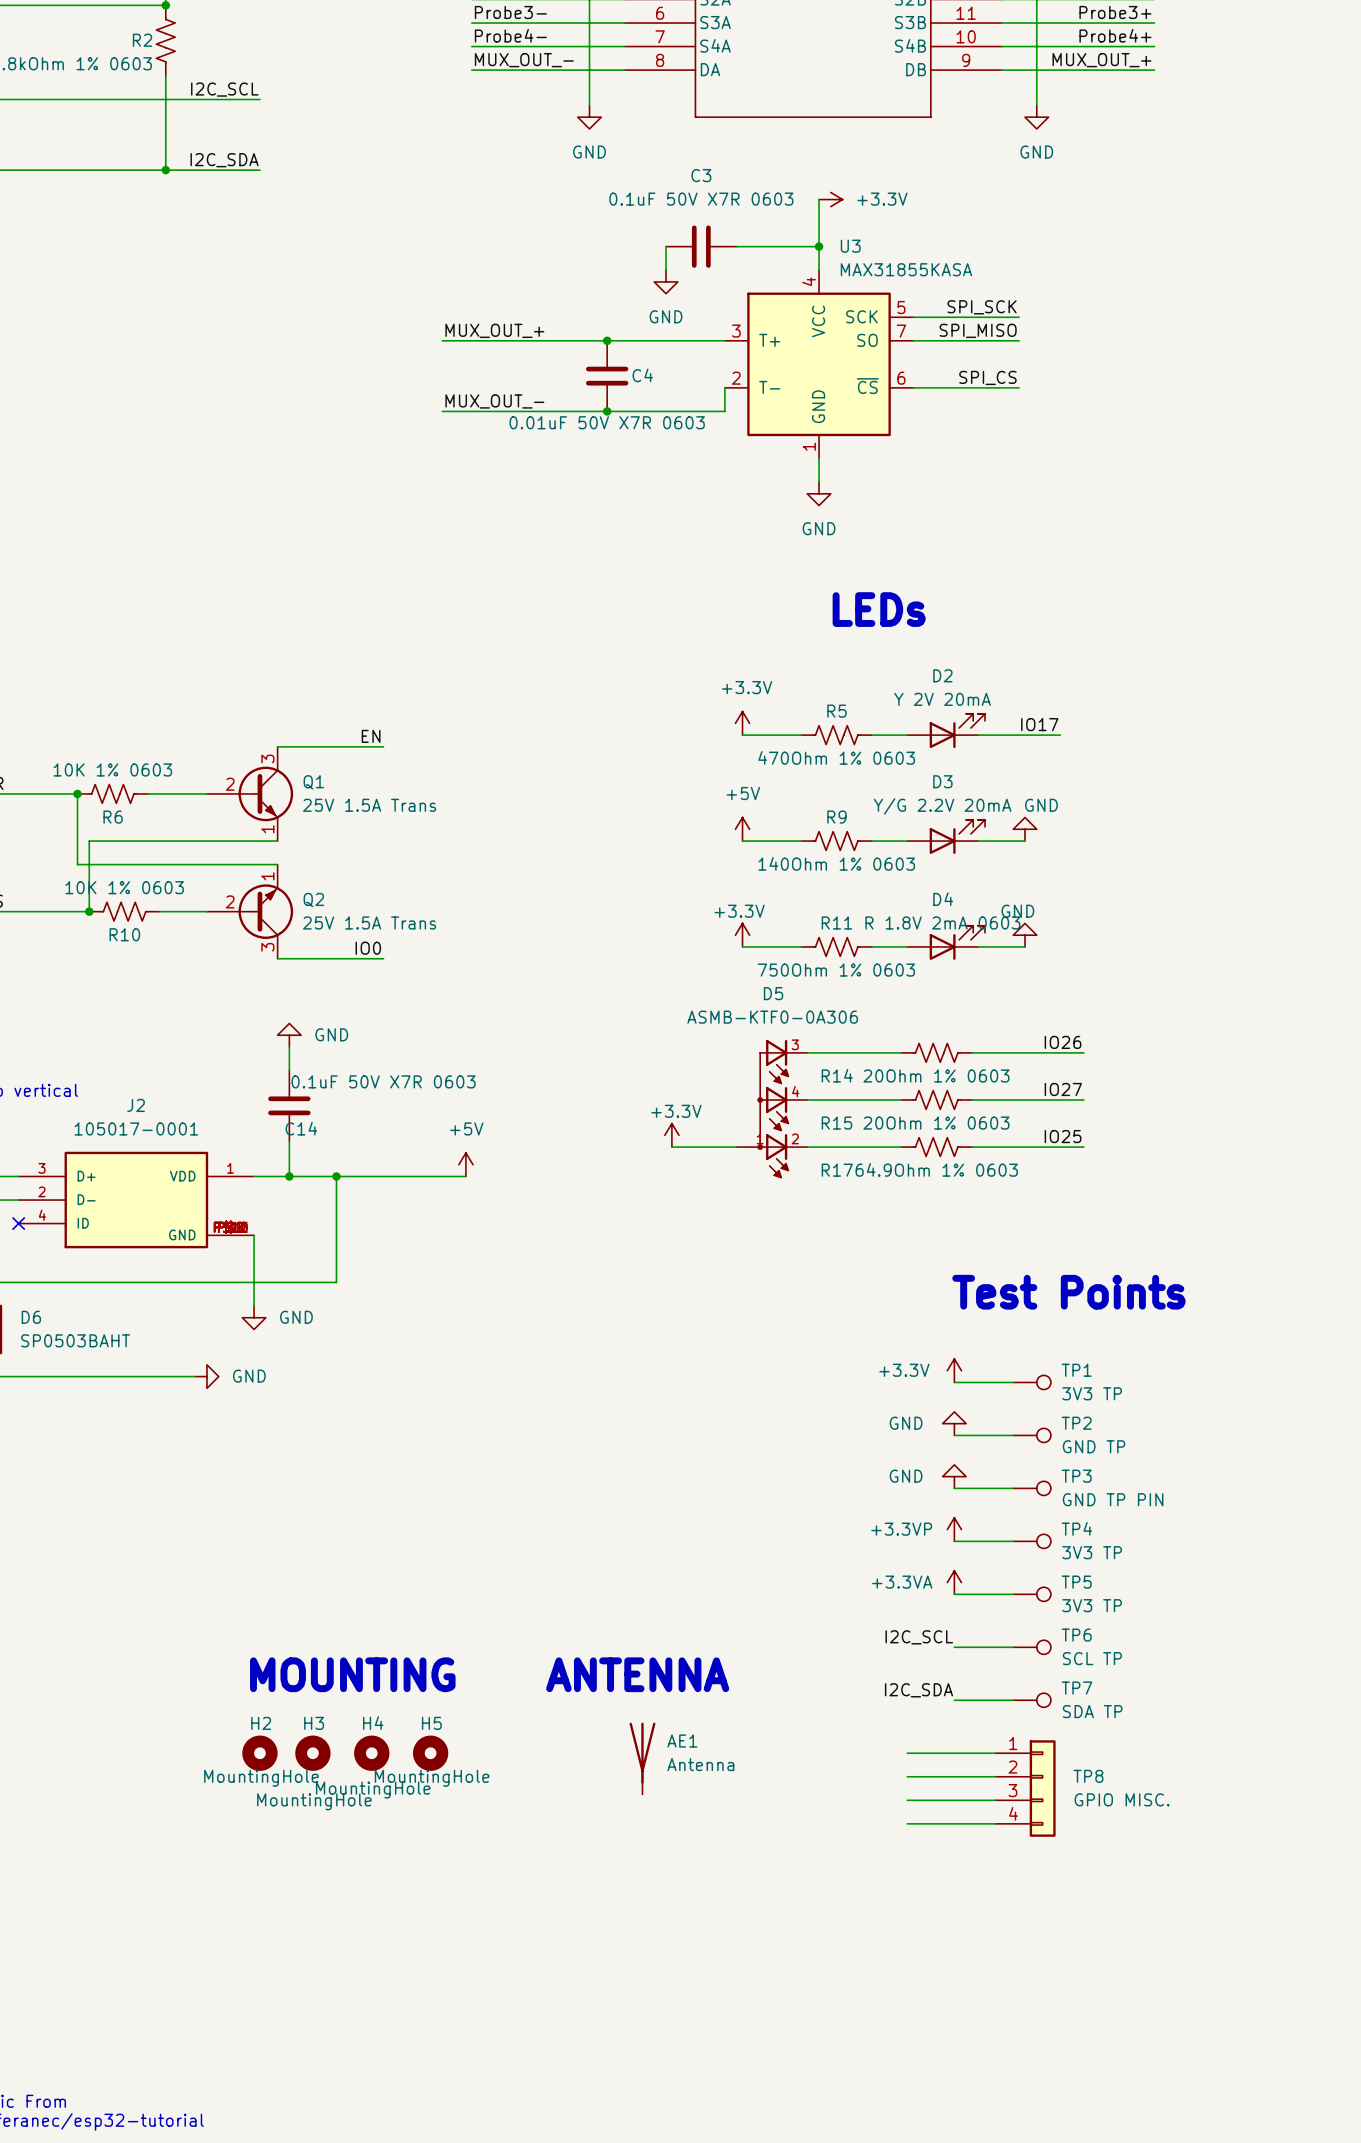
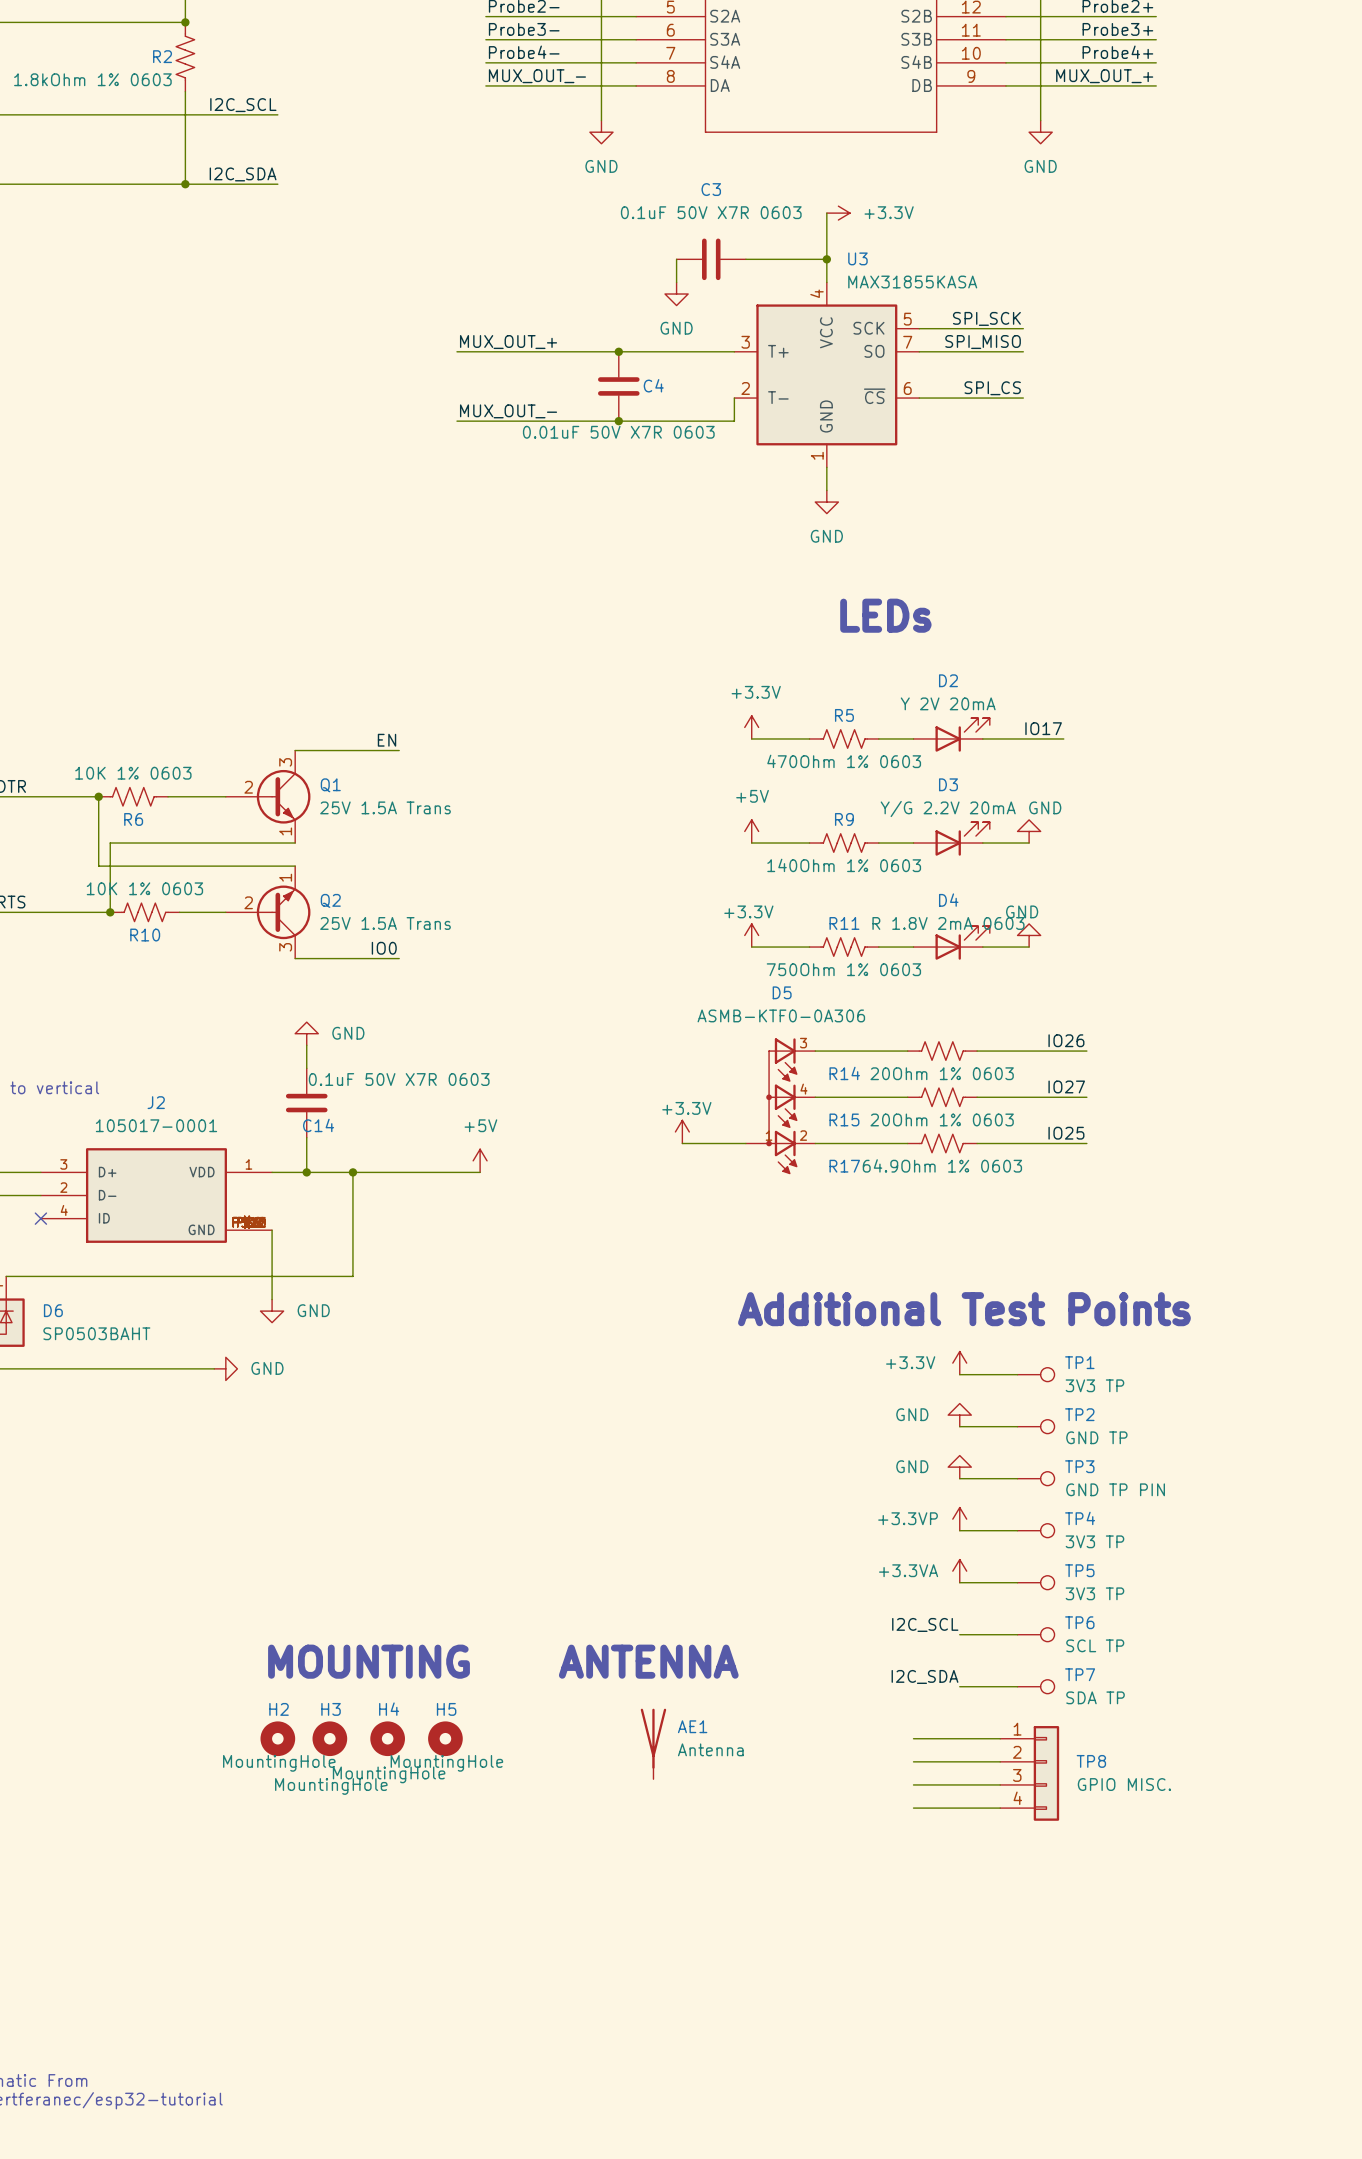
text: Test Points (1068, 1292) -> Additional Test Points (964, 1309)

